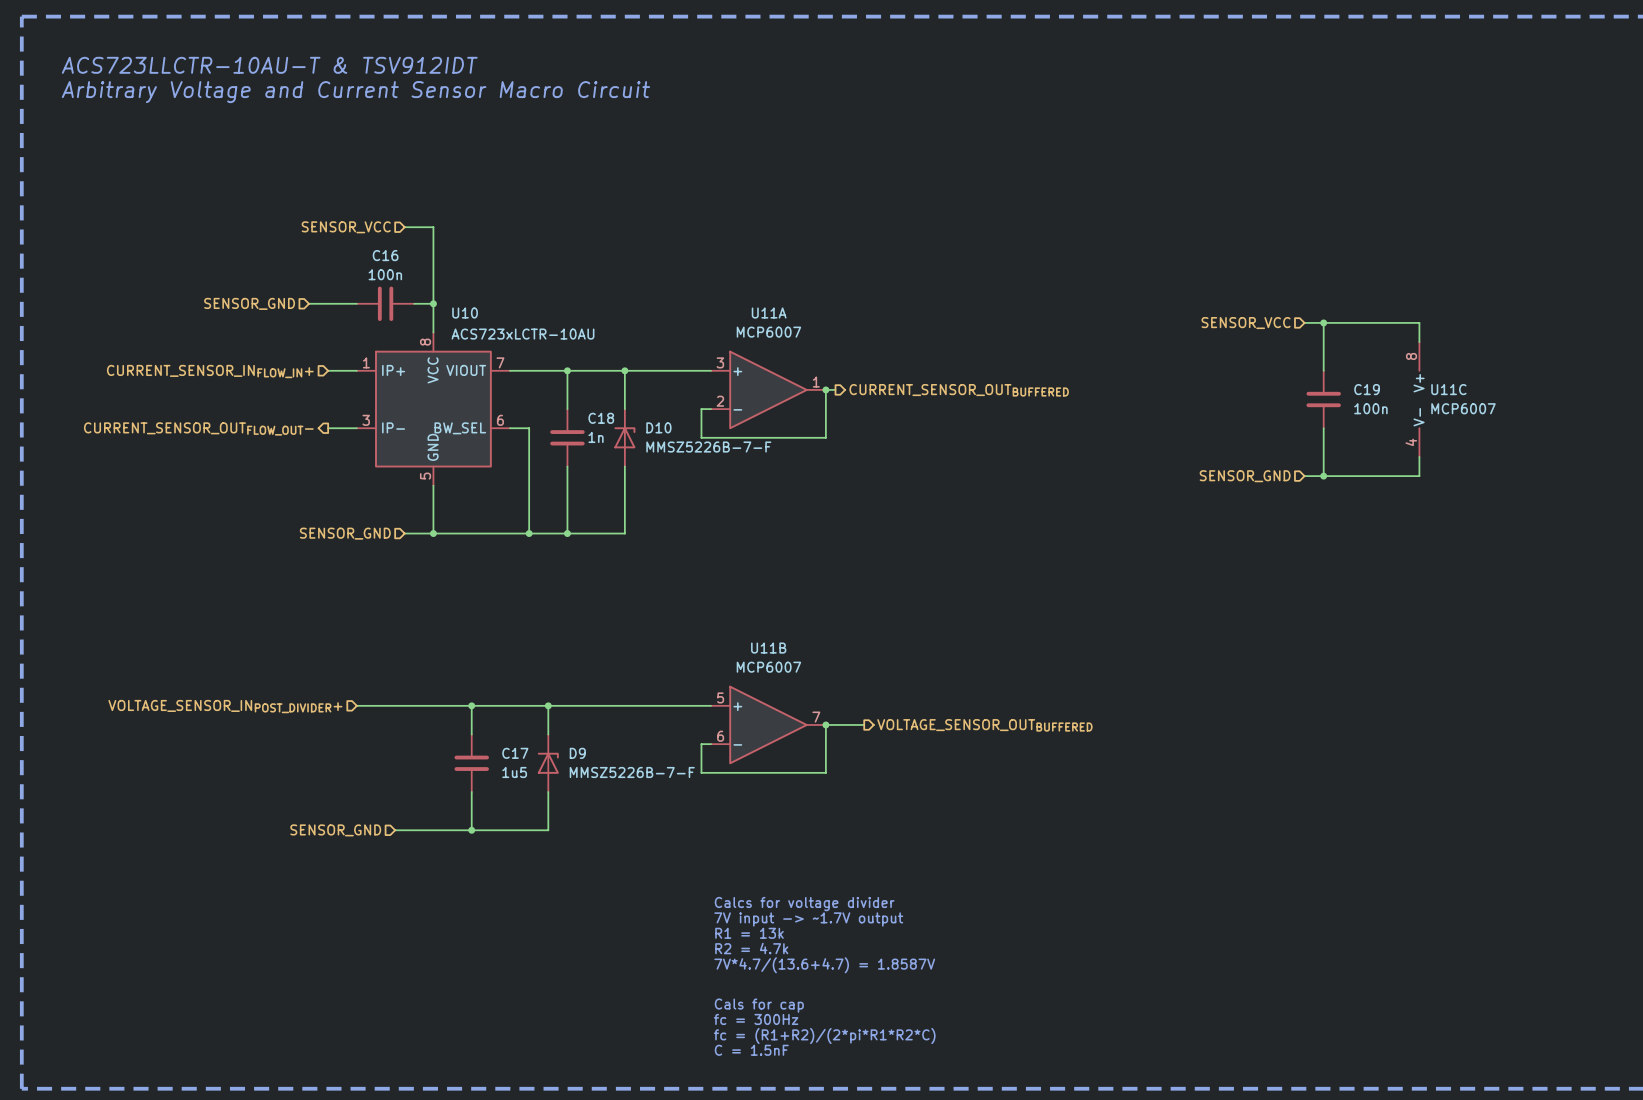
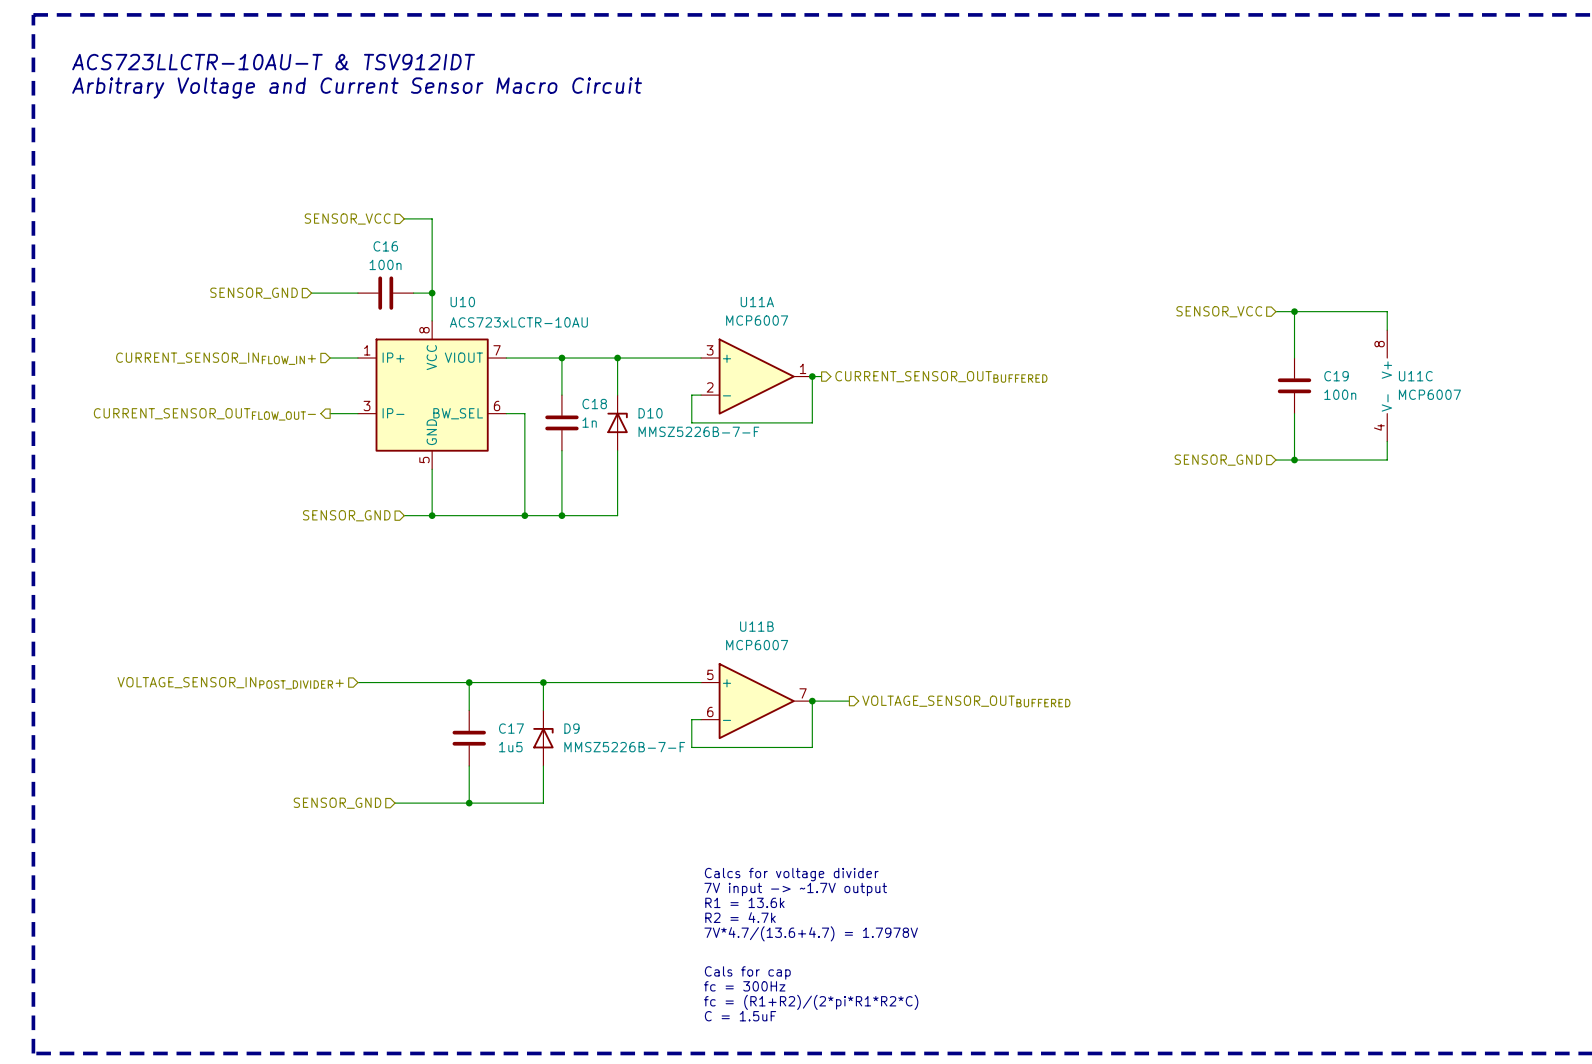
text: R1 = 13k (749, 933) -> R1 = 13.6k (744, 902)
text: 7V*4.7/(13.6+4.7) = 1.8587V (824, 965) -> 7V*4.7/(13.6+4.7) = 1.7978V (811, 933)
text: C = 1.5nF (751, 1050) -> C = 1.5uF (740, 1016)

